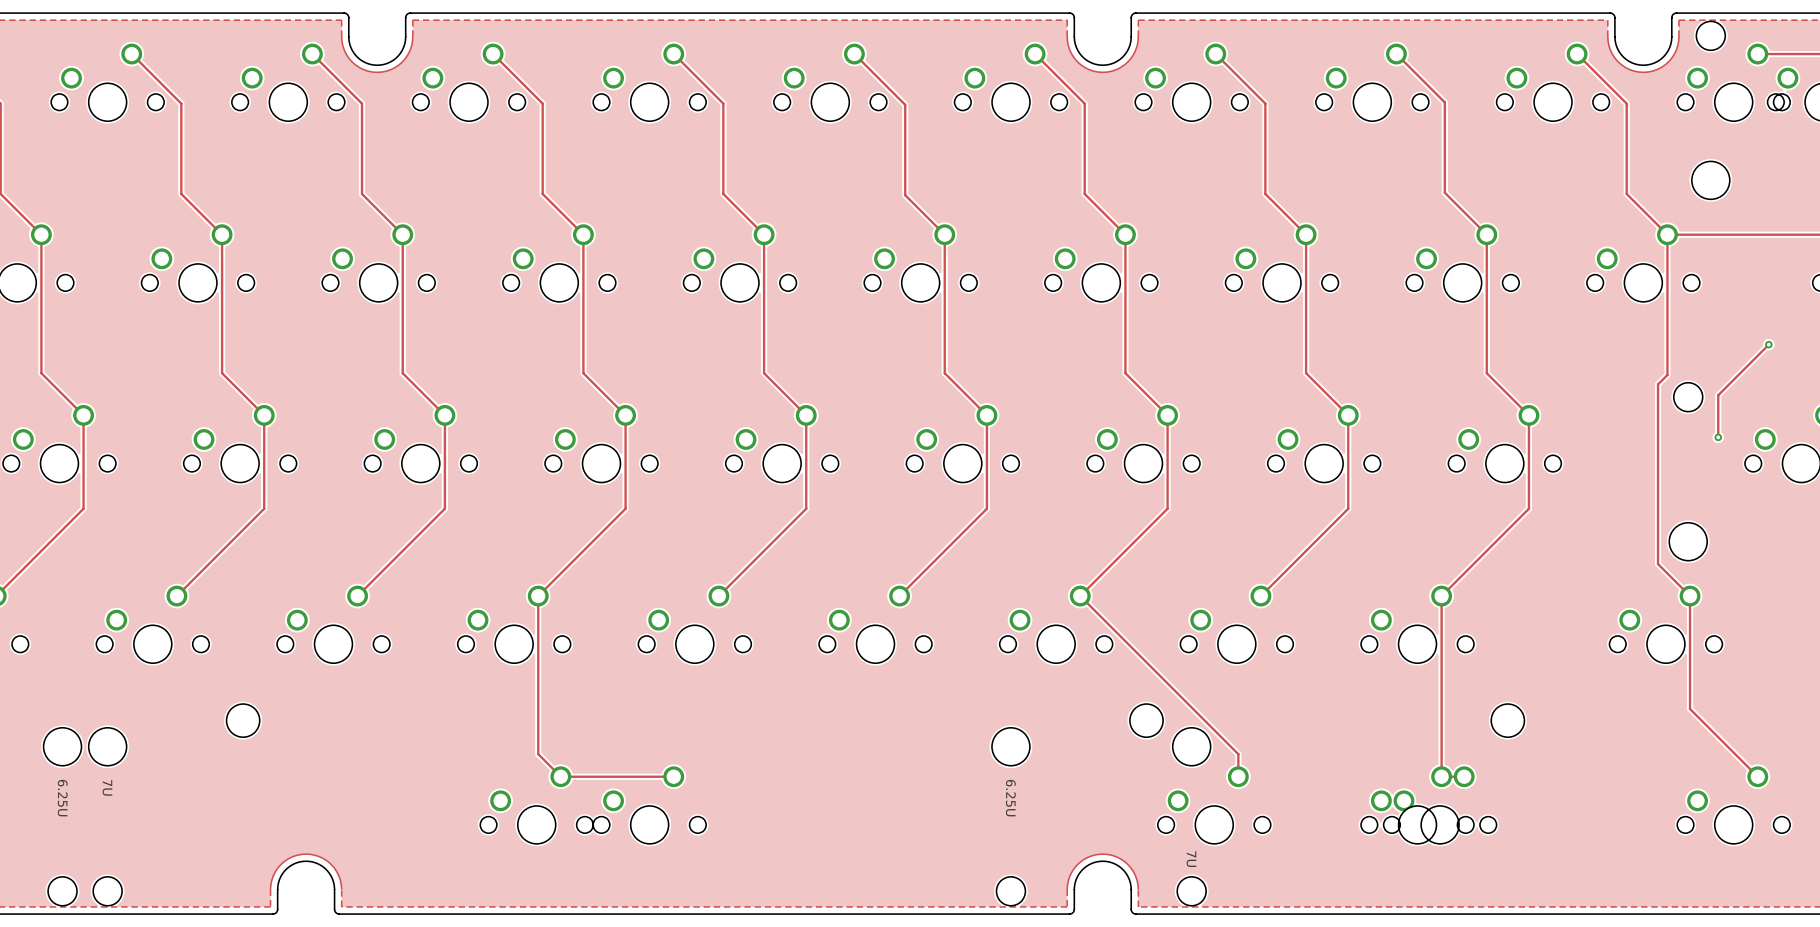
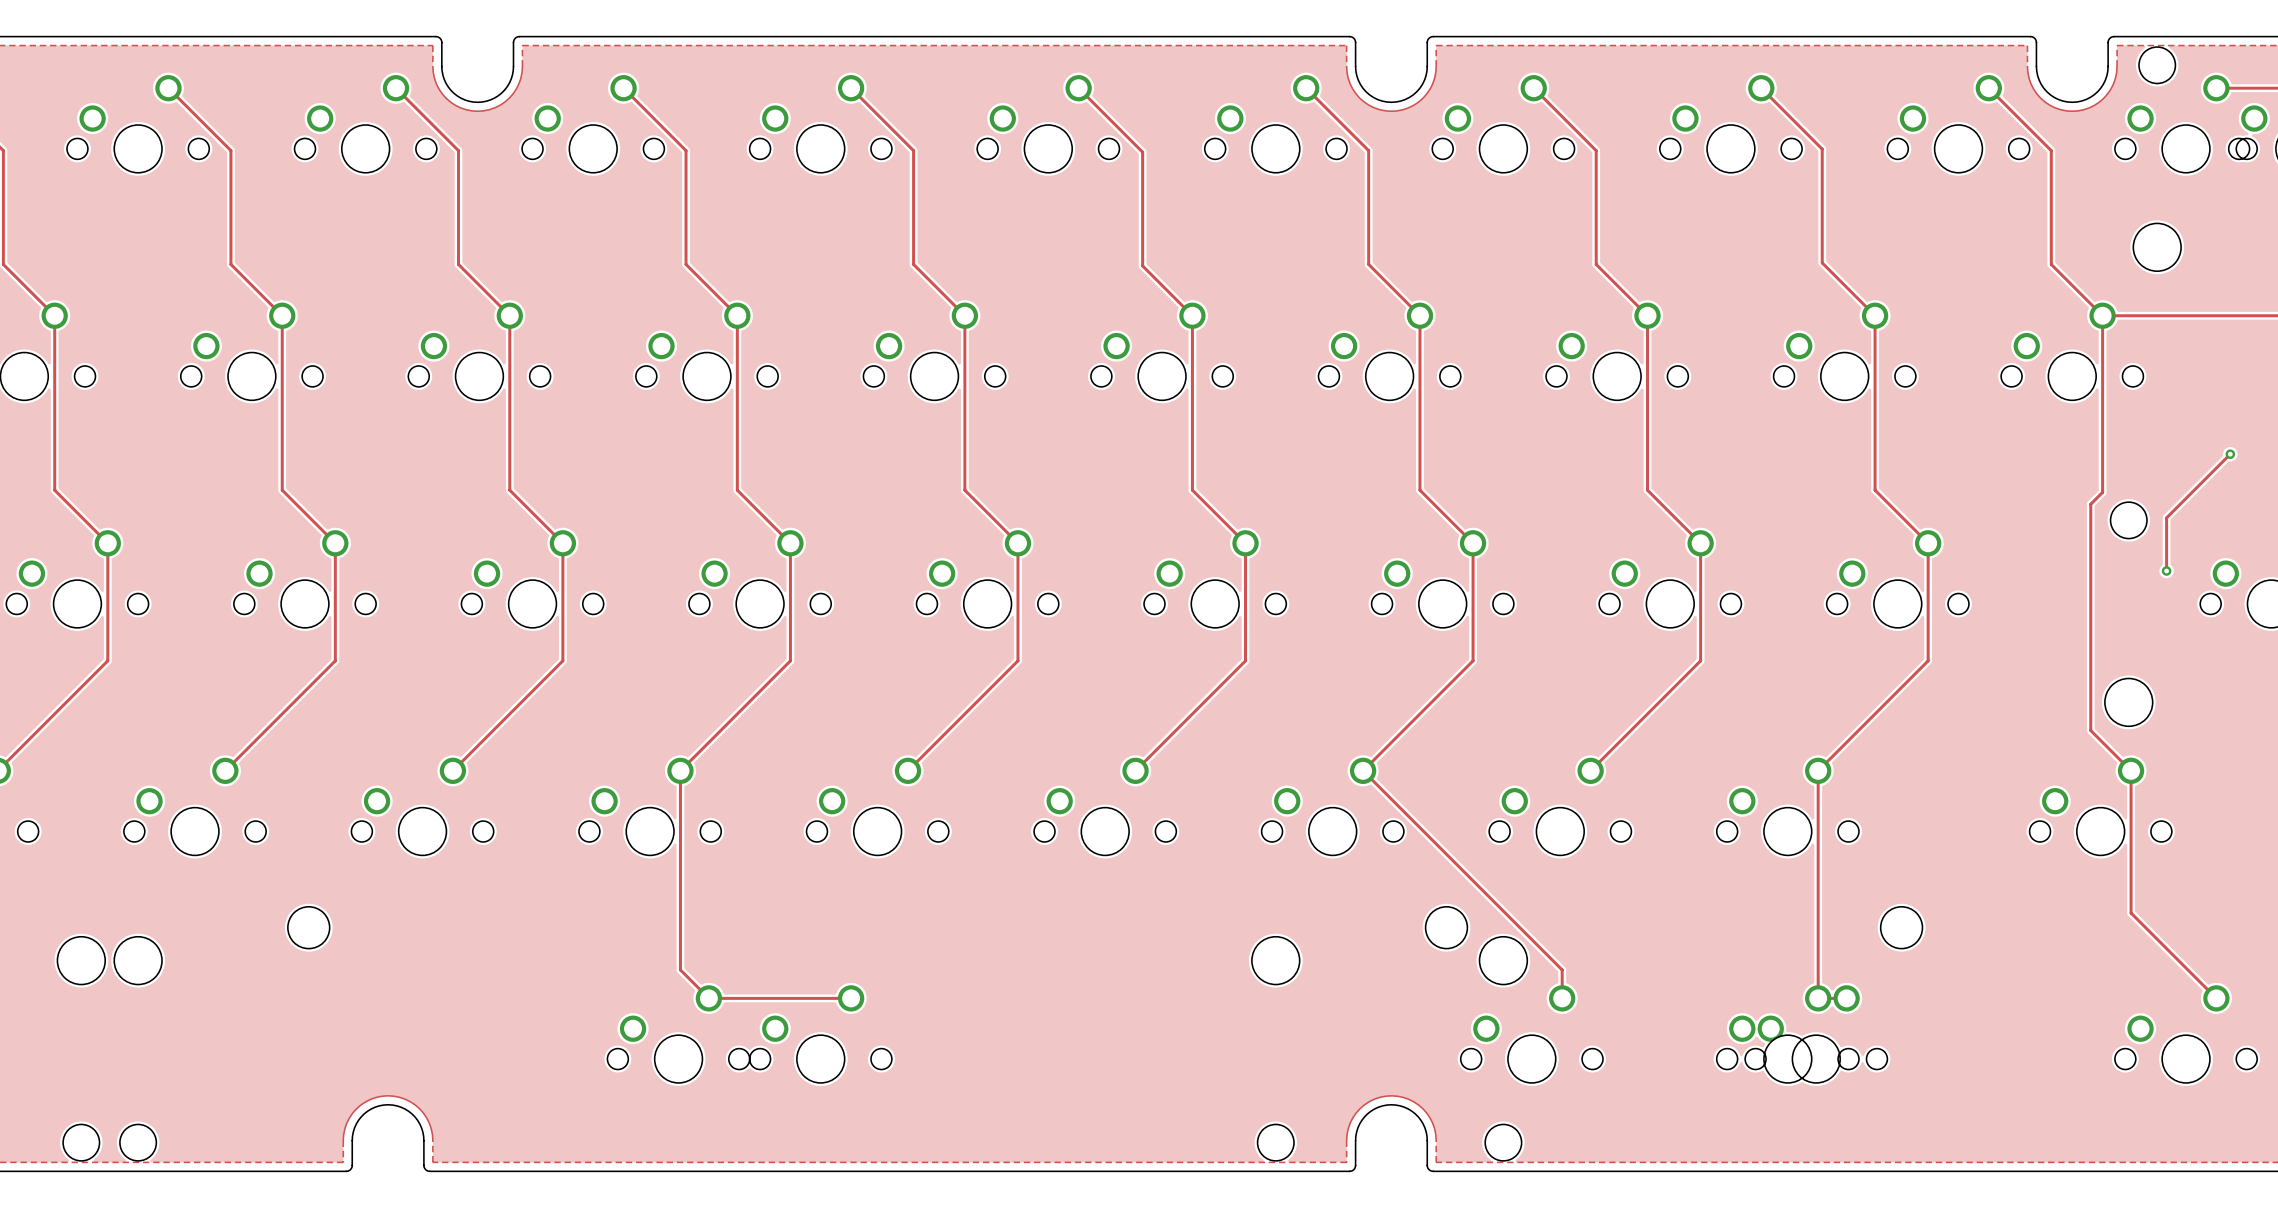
text: 7U (107, 787) -> none
text: 6.25U (62, 798) -> none
text: 6.25U (1010, 798) -> none
text: 7U (1191, 859) -> none

